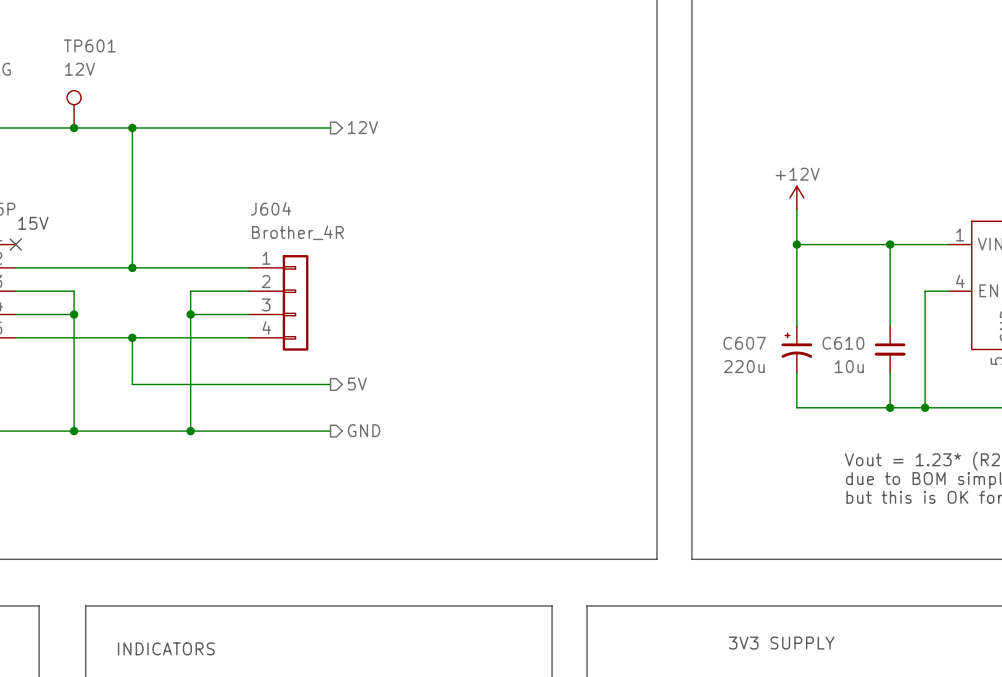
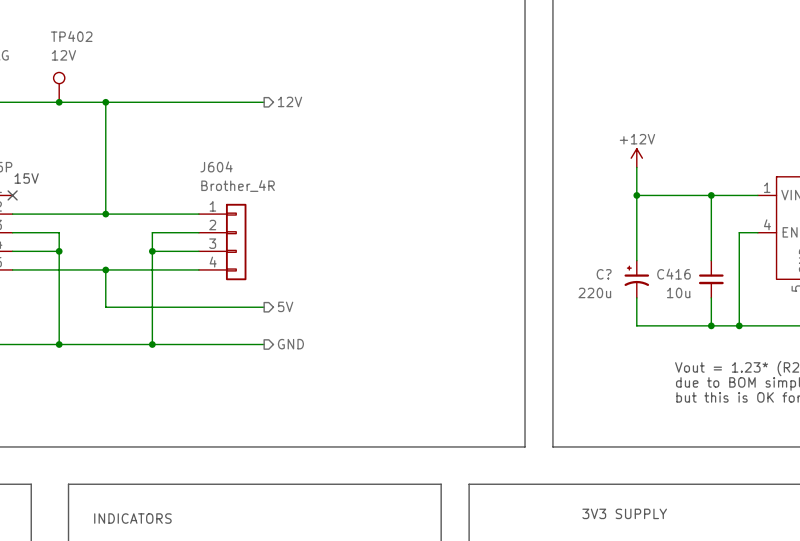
TP601 name: TP601 (89, 45) -> TP402 (71, 36)
C607 name: C607 (744, 343) -> C? (604, 274)
C610 name: C610 (843, 343) -> C416 (673, 274)

